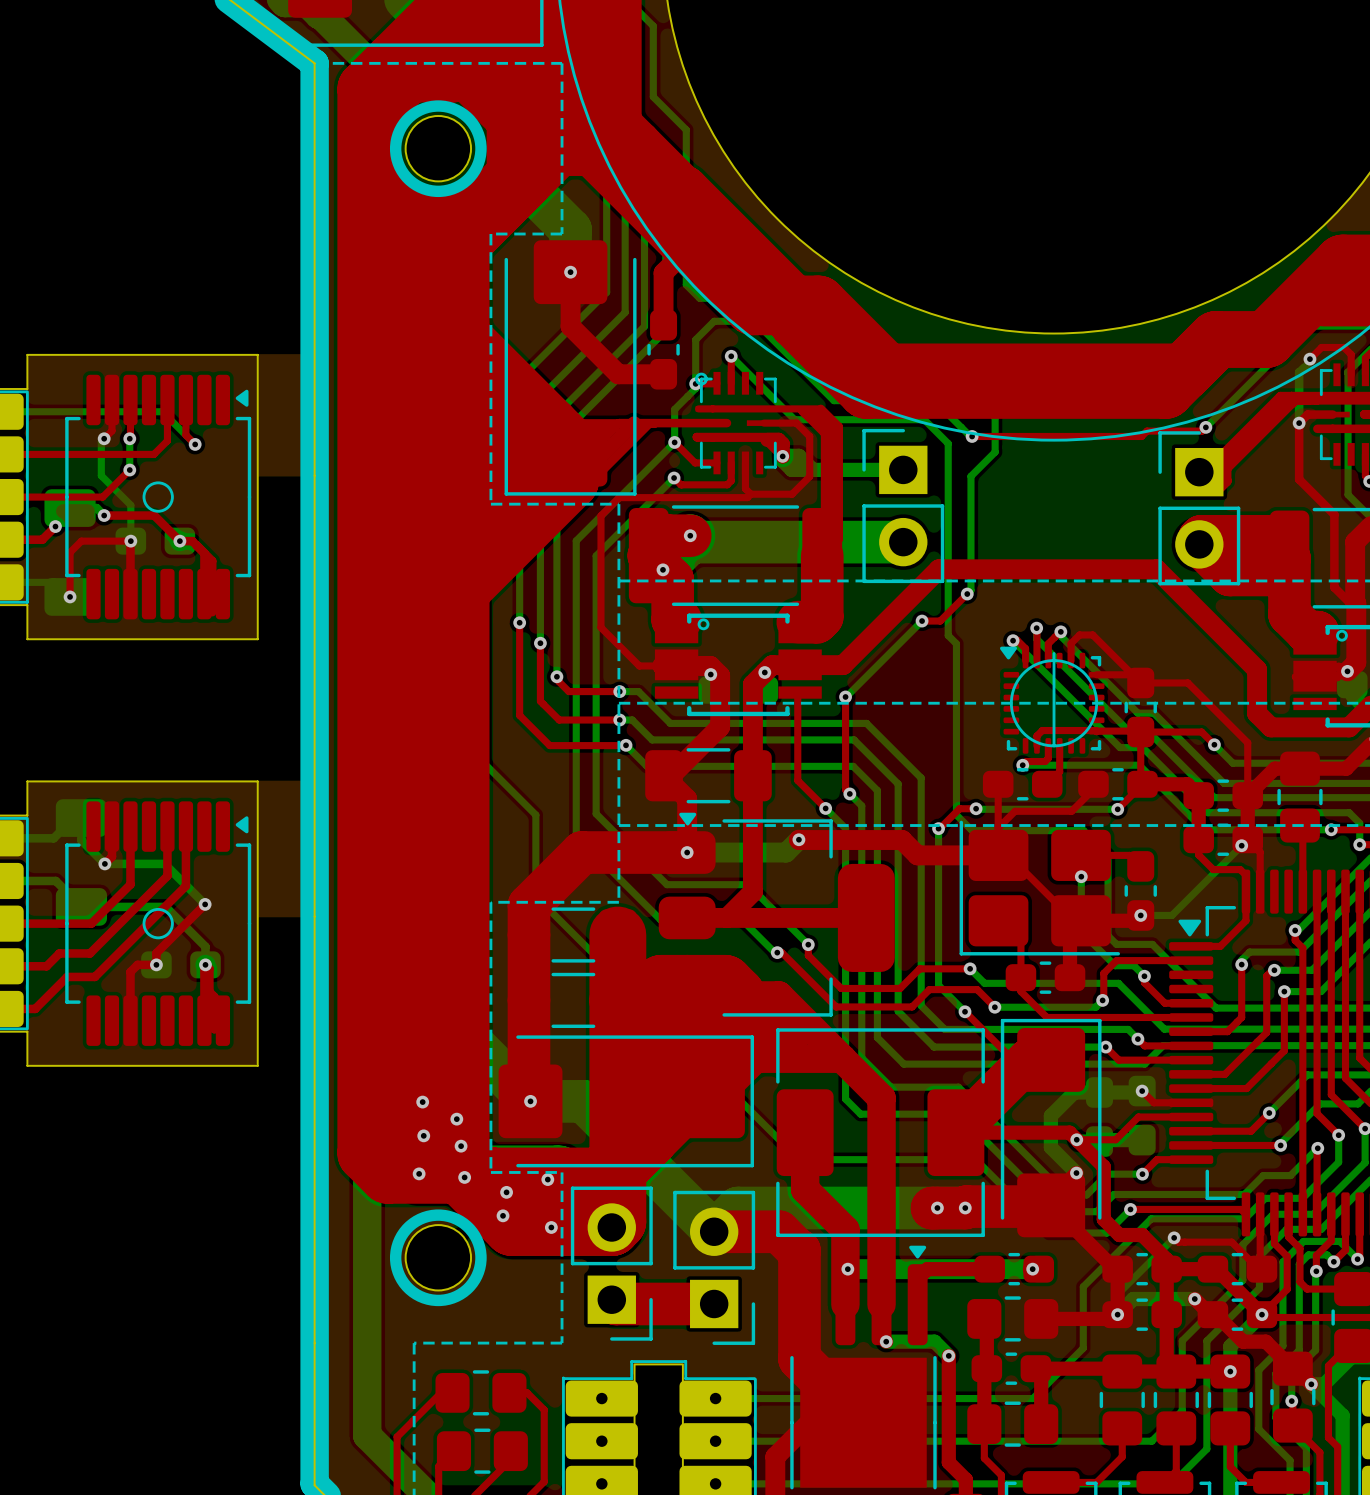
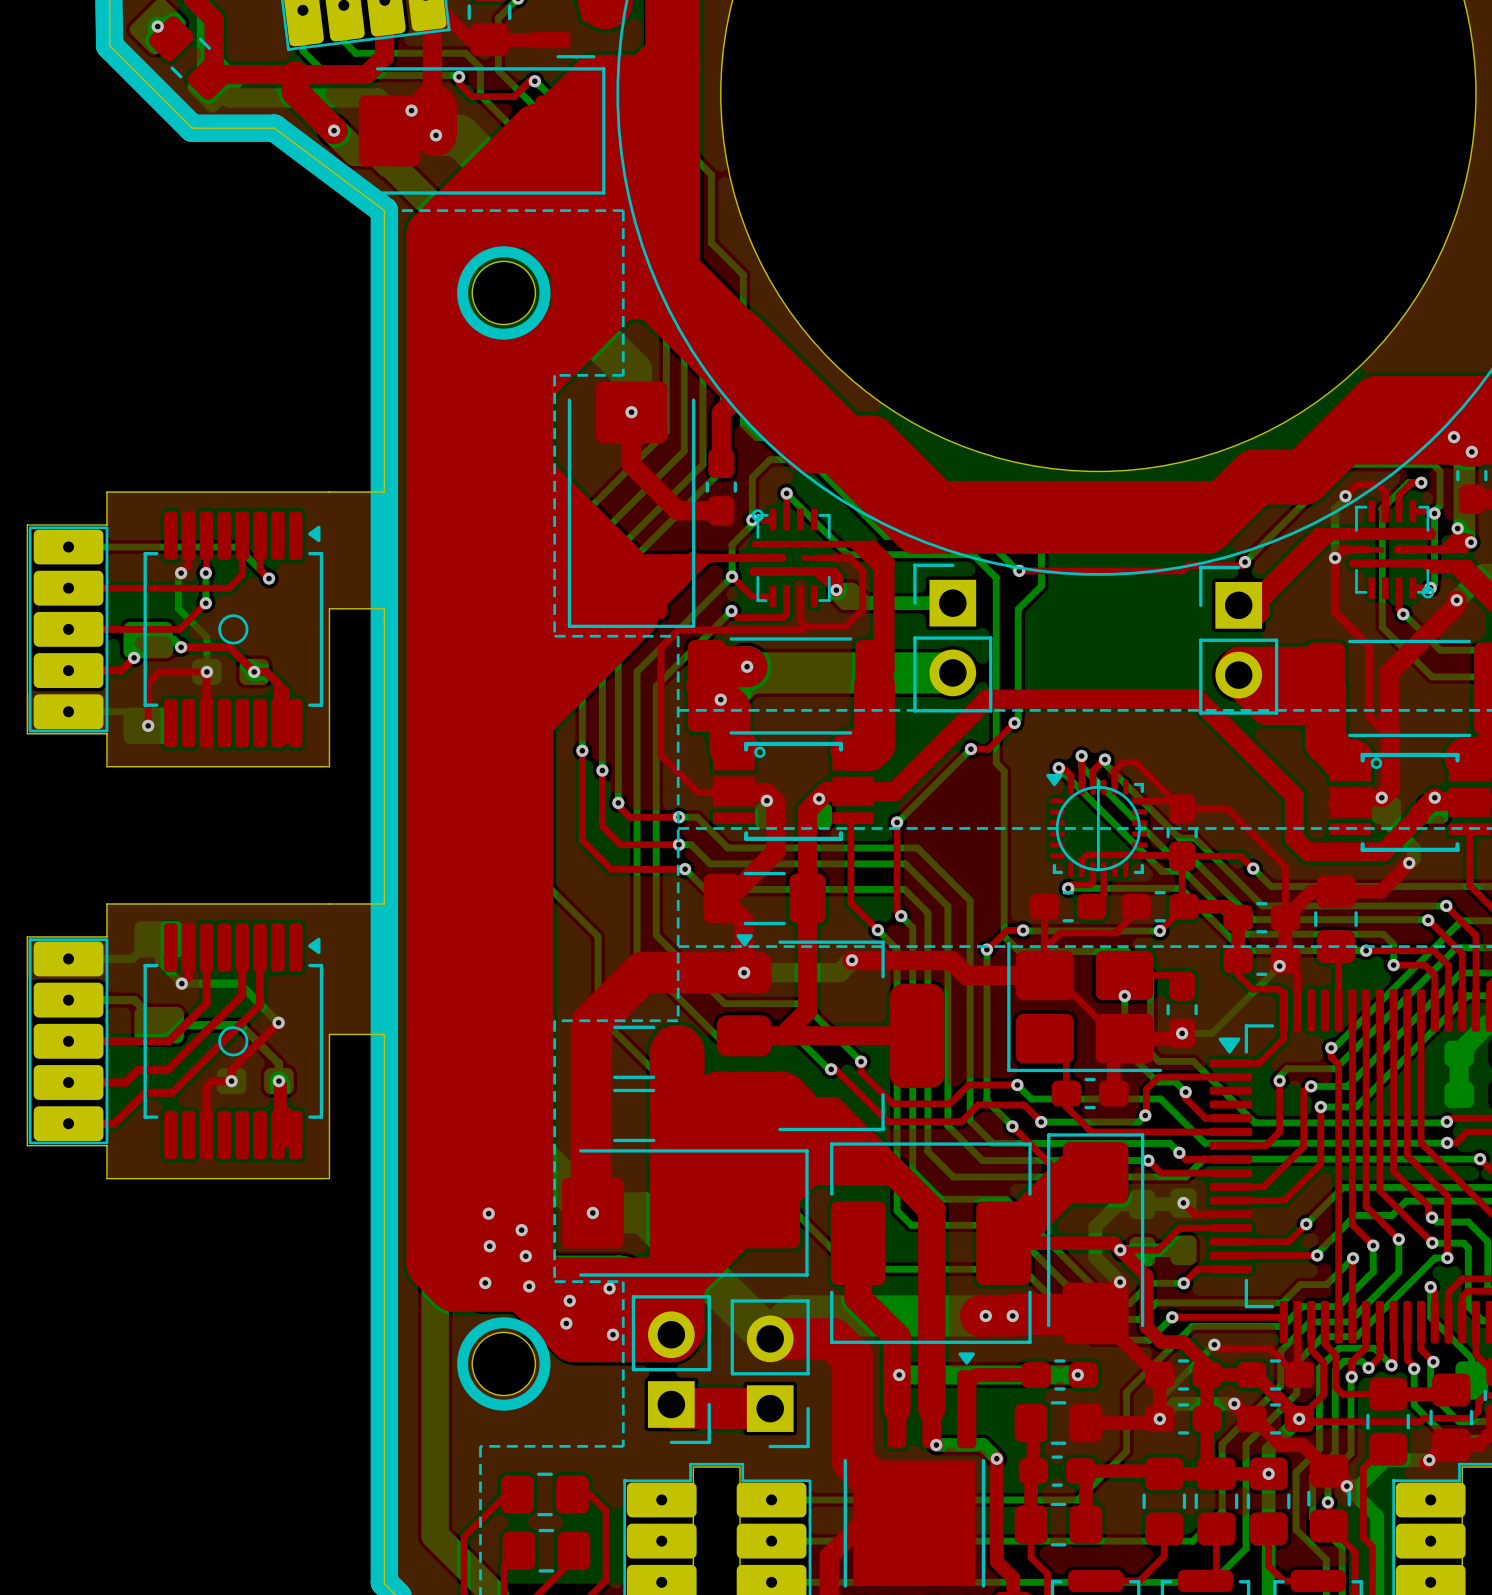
board edge: (257, 354) (257, 475) -> (329, 492) (384, 492)
board edge: (314, 354) (314, 475) -> (329, 608) (384, 608)
board edge: (257, 781) (257, 916) -> (329, 904) (384, 904)
board edge: (314, 781) (314, 916) -> (329, 1034) (384, 1034)

